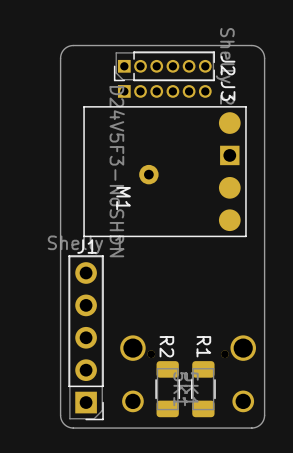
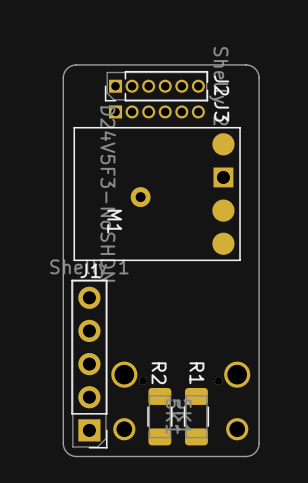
board edge: (86, 45) (66, 47) (62, 51) (60, 58) (60, 416) (63, 423) (68, 427) (86, 428) -> (76, 64) (67, 68) (63, 77) (63, 443) (67, 452) (76, 456)
J1 position: (86, 337) -> (89, 364)

